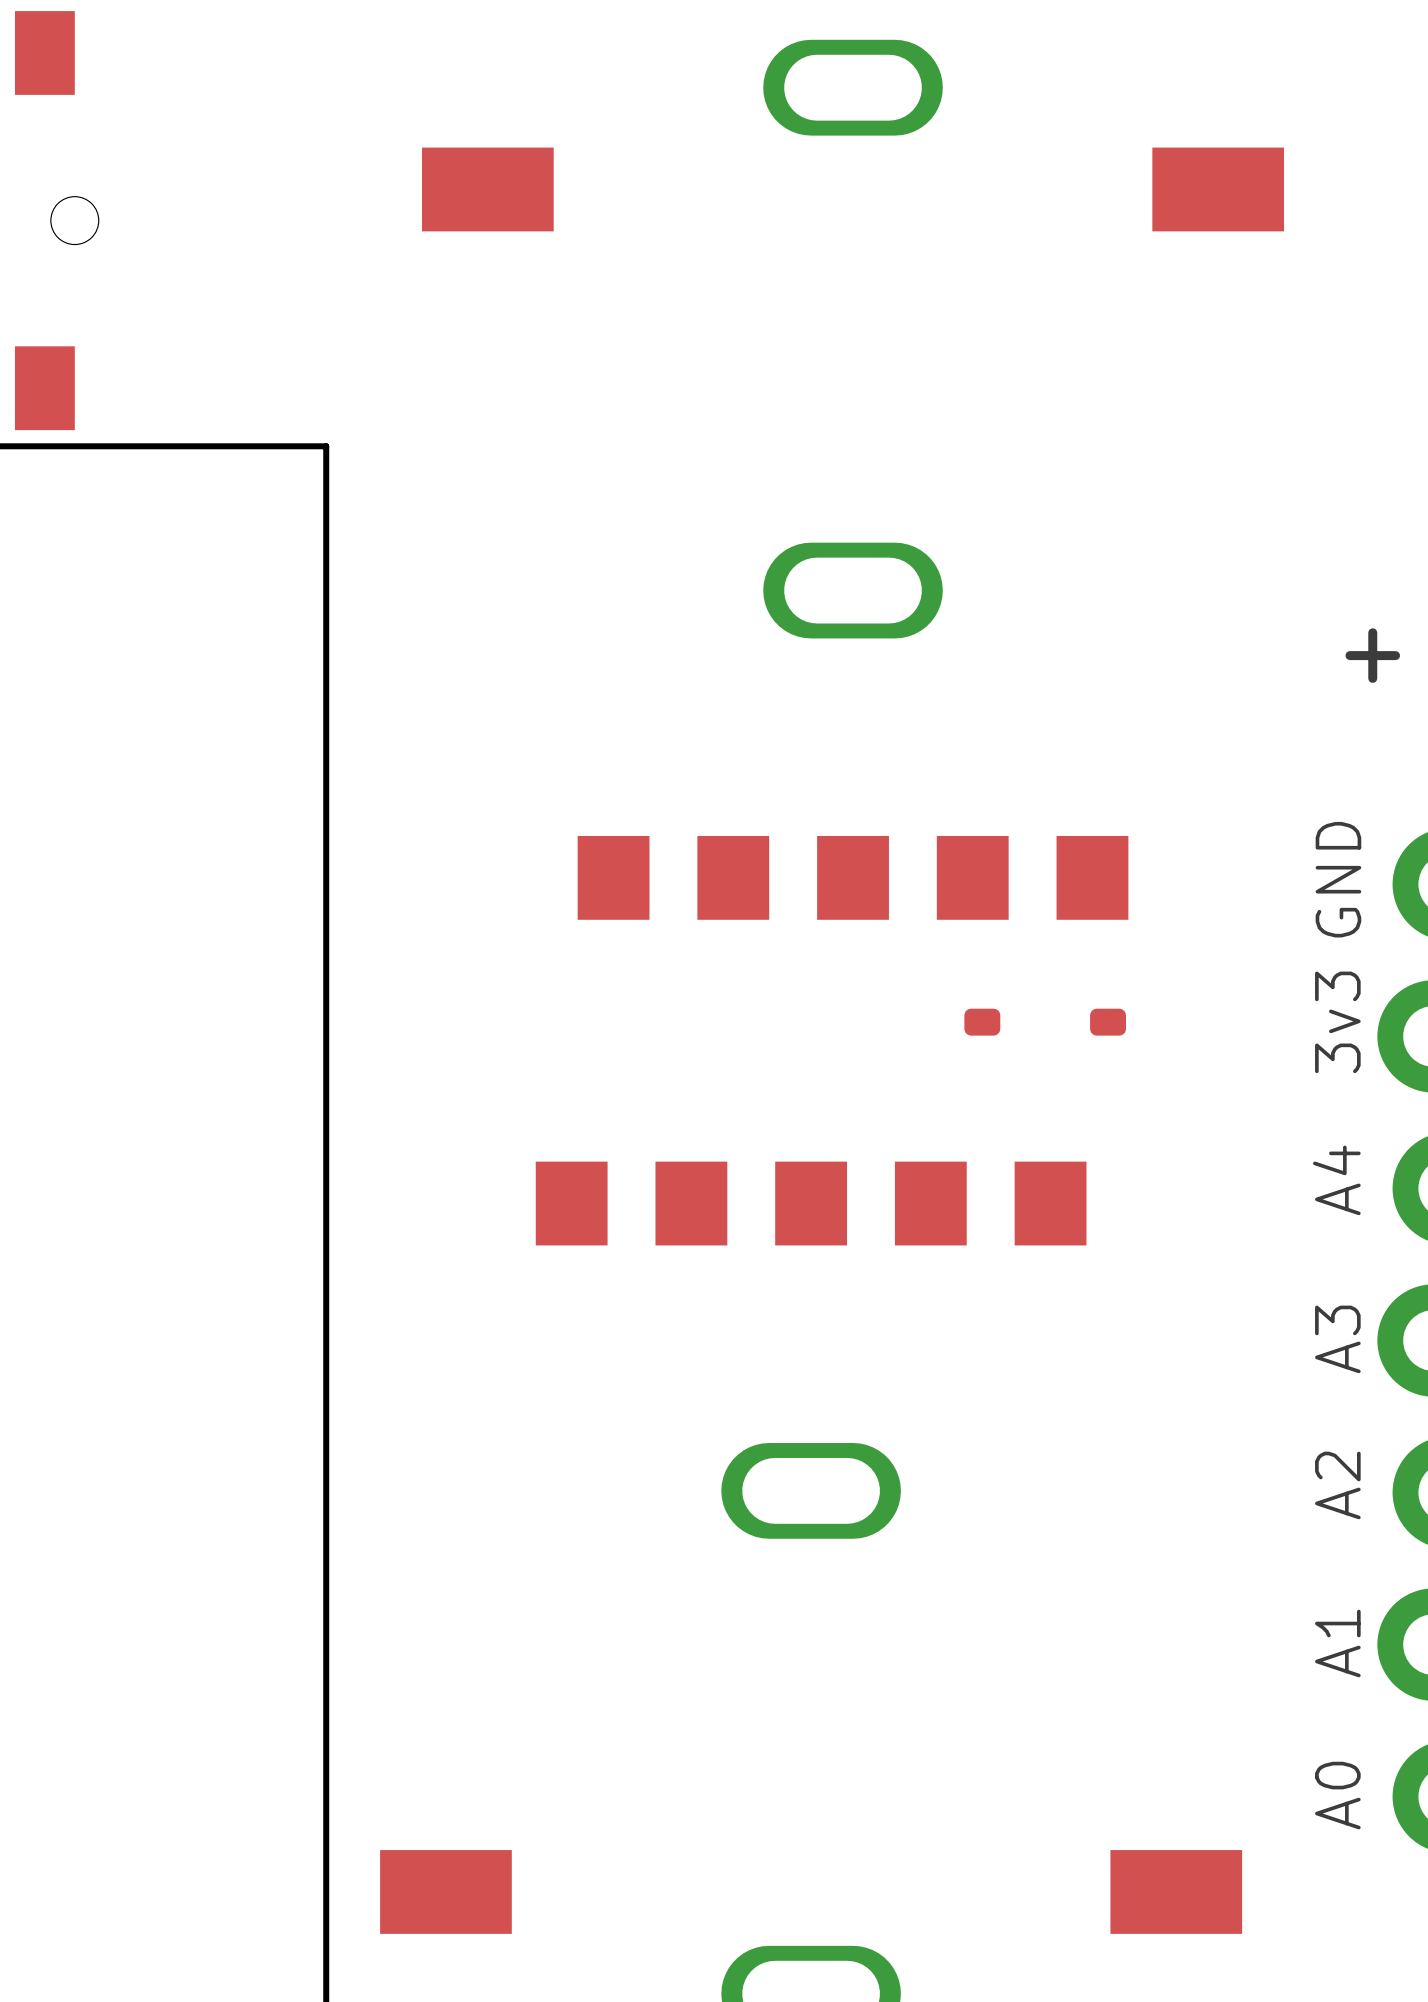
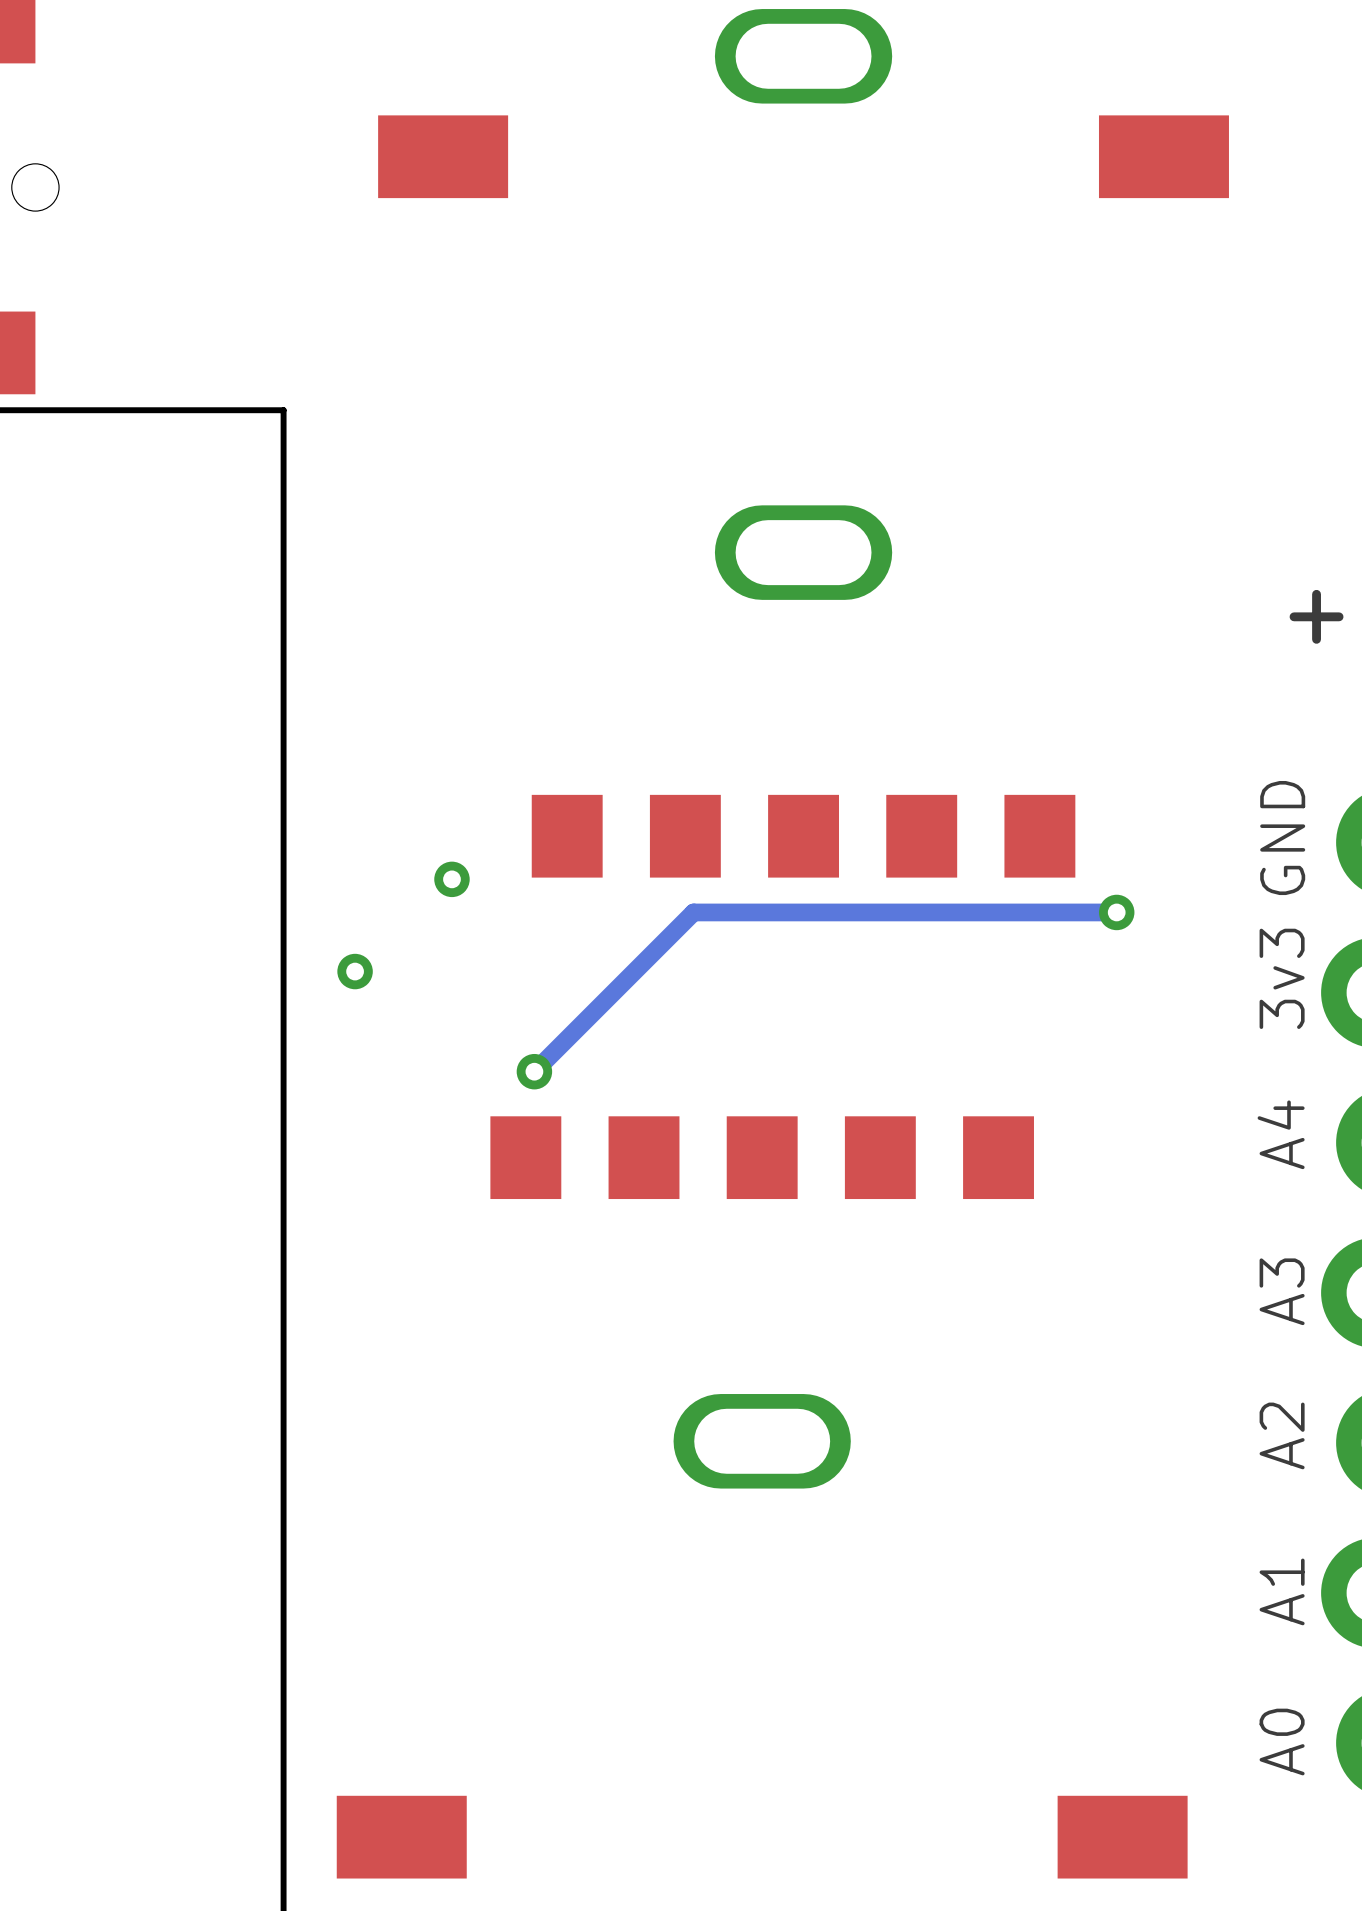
via: none -> (451, 879)
bottom track: none -> (1116, 912) (693, 912) (534, 1071)
via: none -> (1116, 912)
via: none -> (355, 971)
part: (1045, 1022) -> none
via: none -> (534, 1071)

